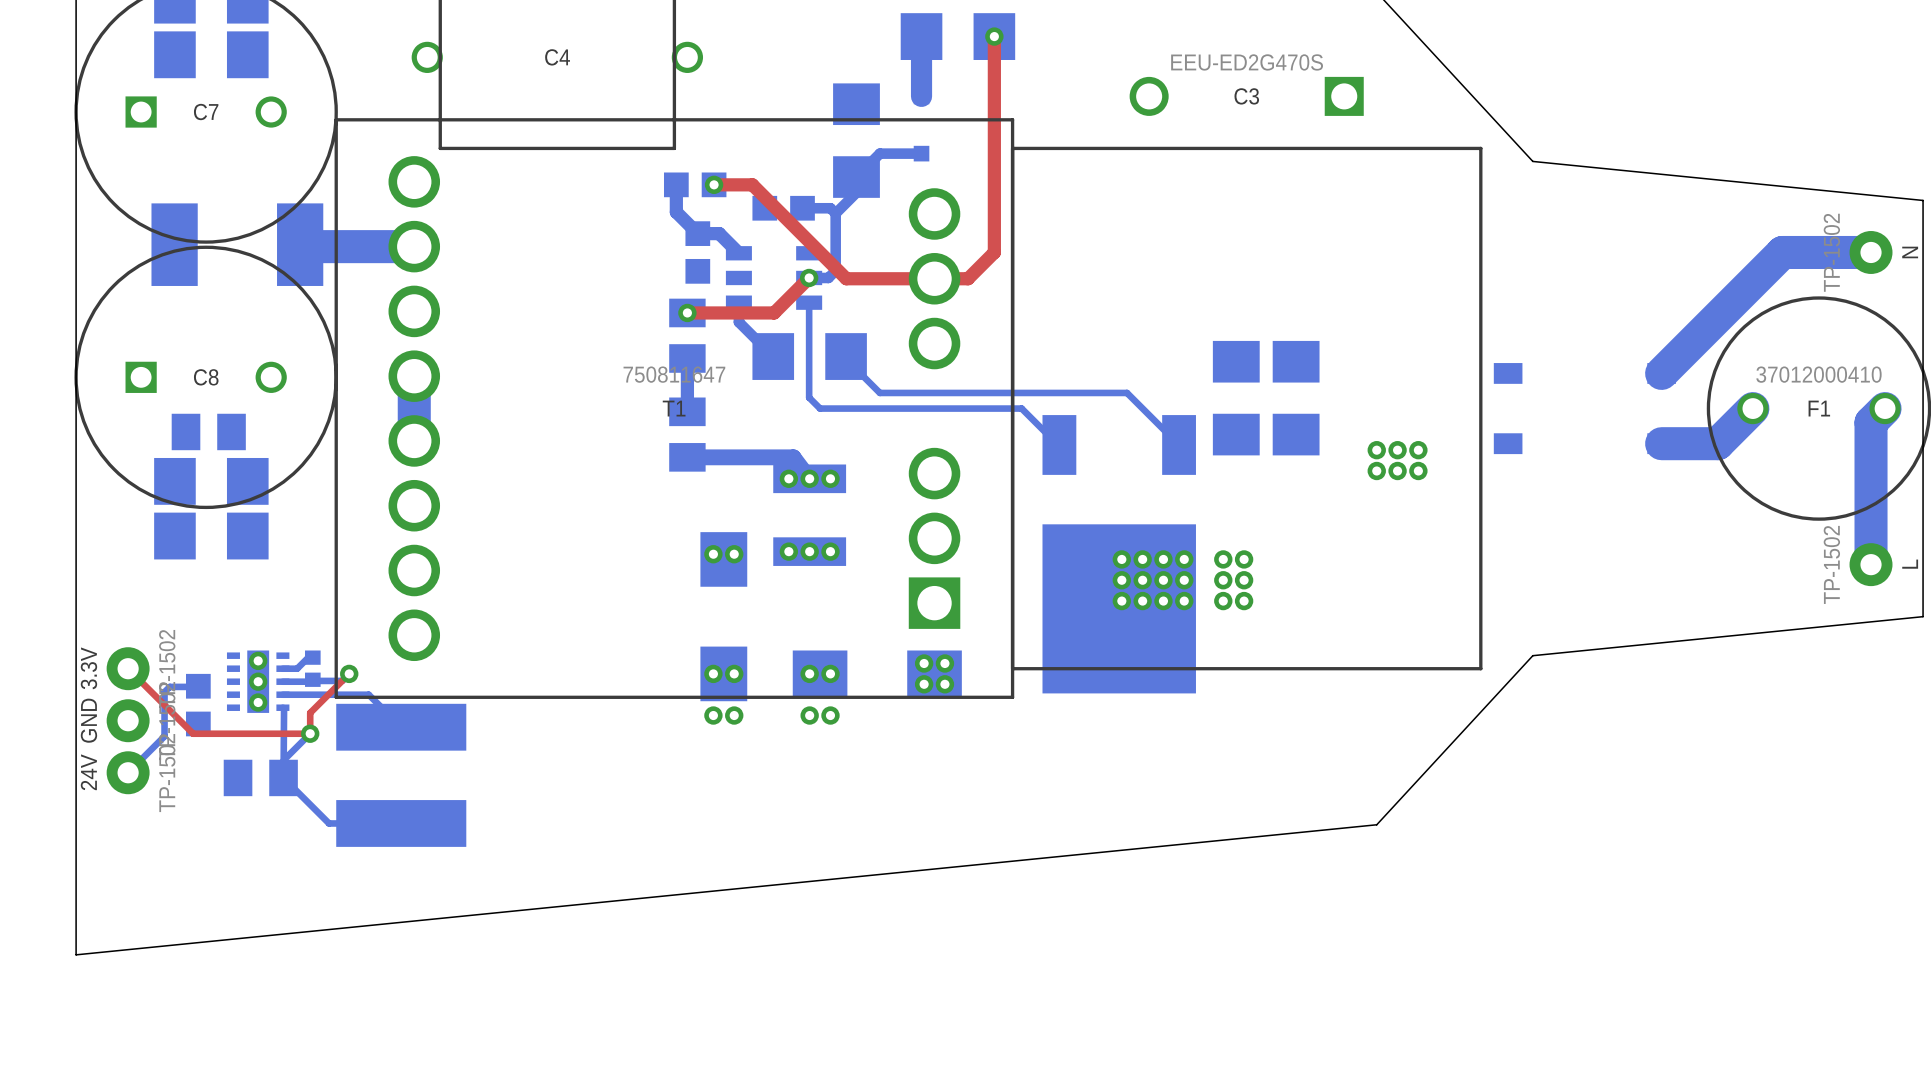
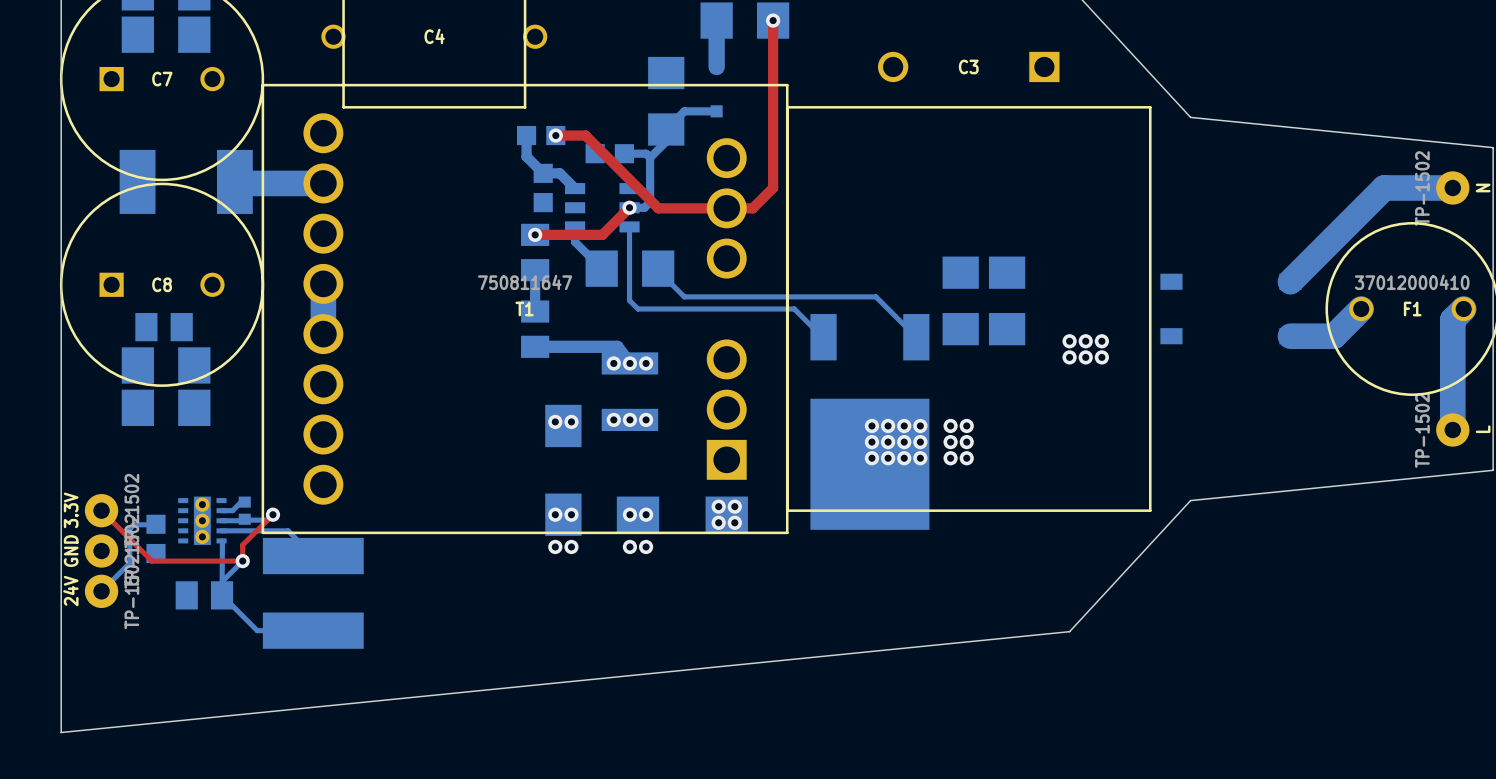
C3 value: EEU-ED2G470S (1247, 62) -> none

